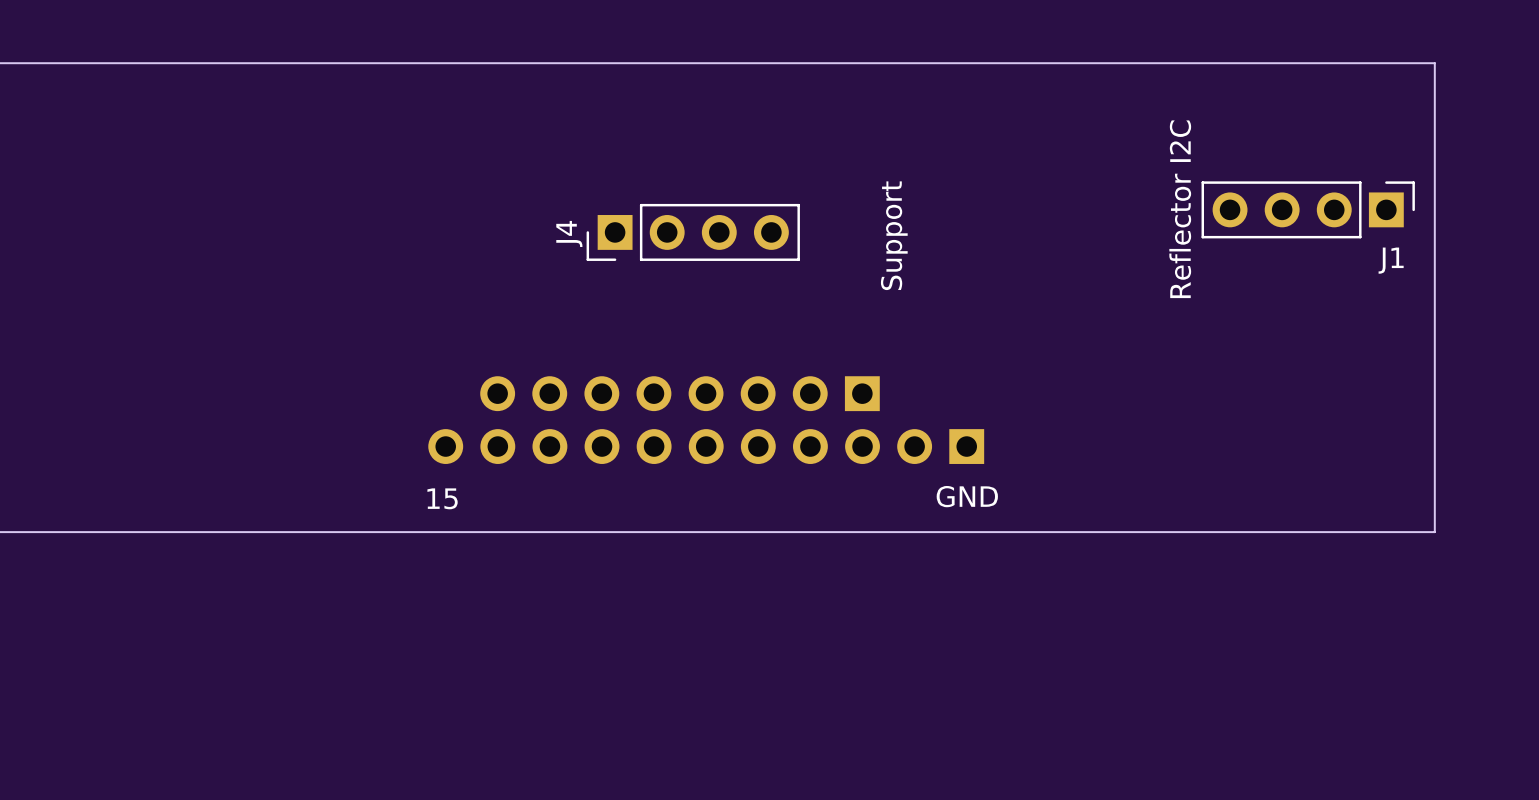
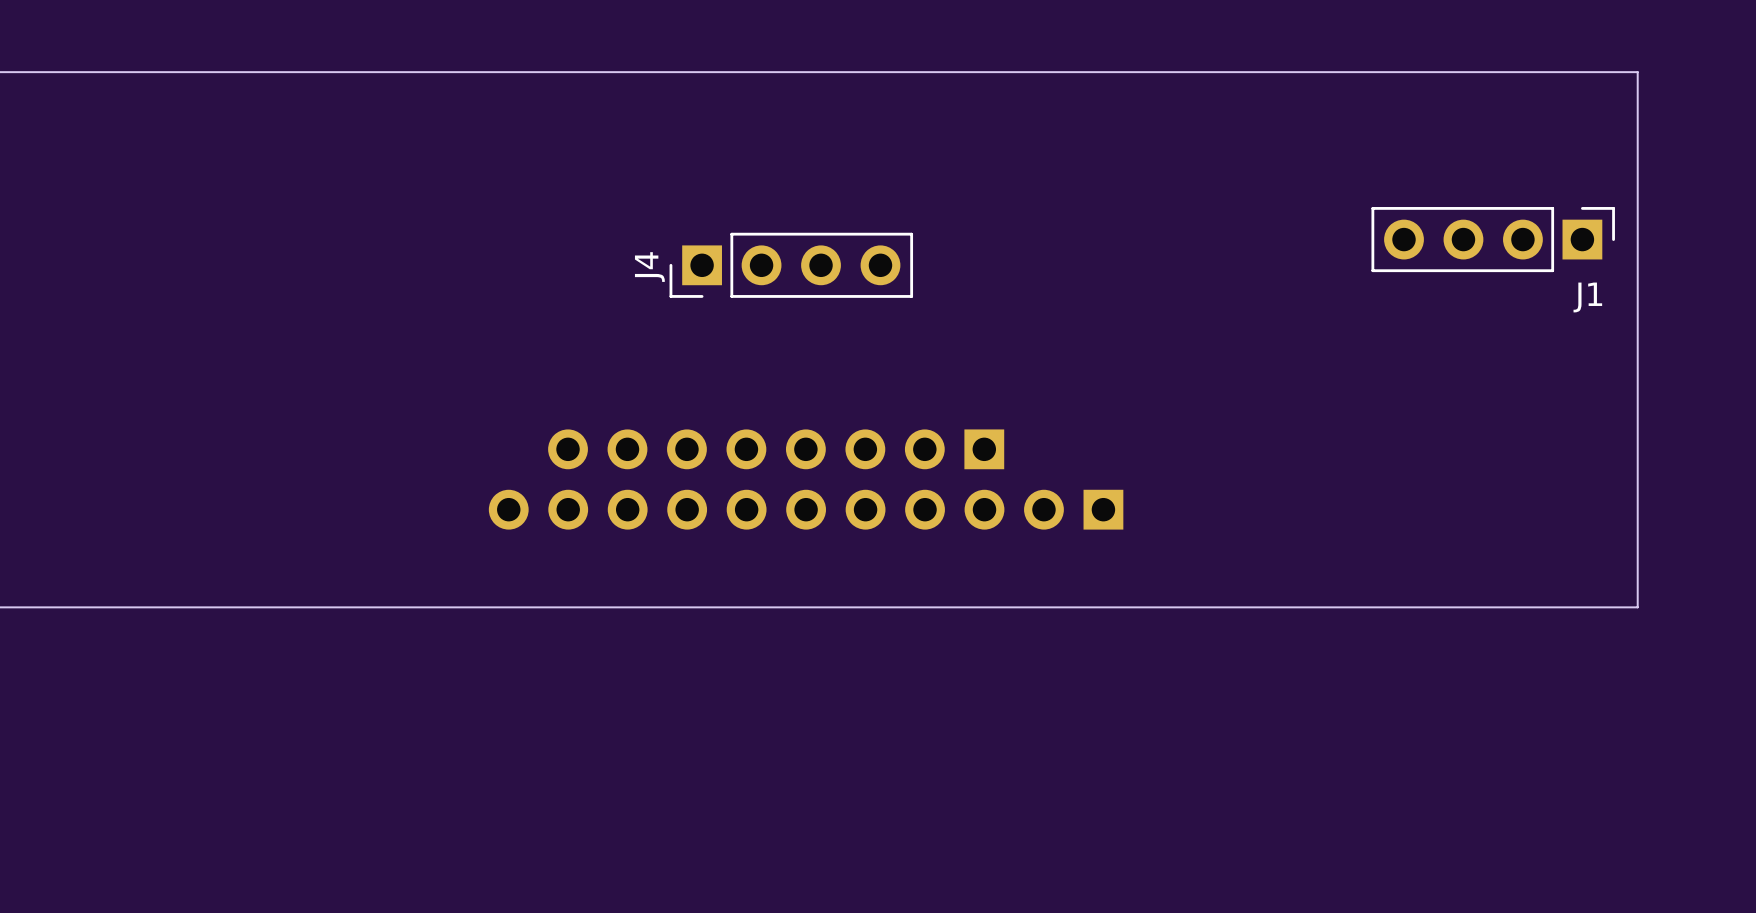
text: Reflector I2C (1180, 209) -> none
text: Support (894, 235) -> none
text: GND (967, 496) -> none
text: 15 (442, 498) -> none

